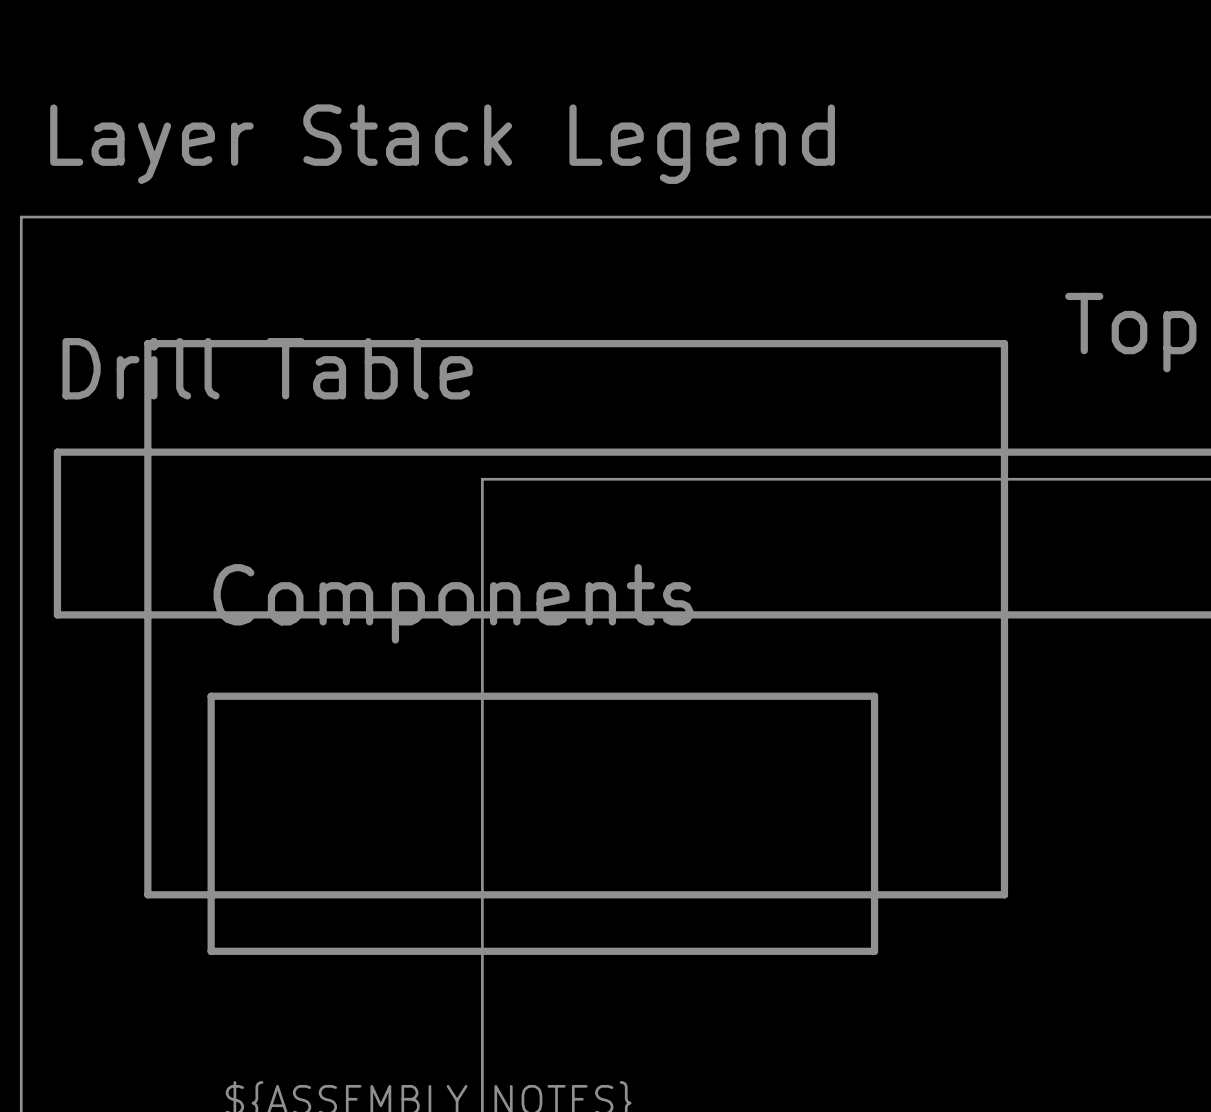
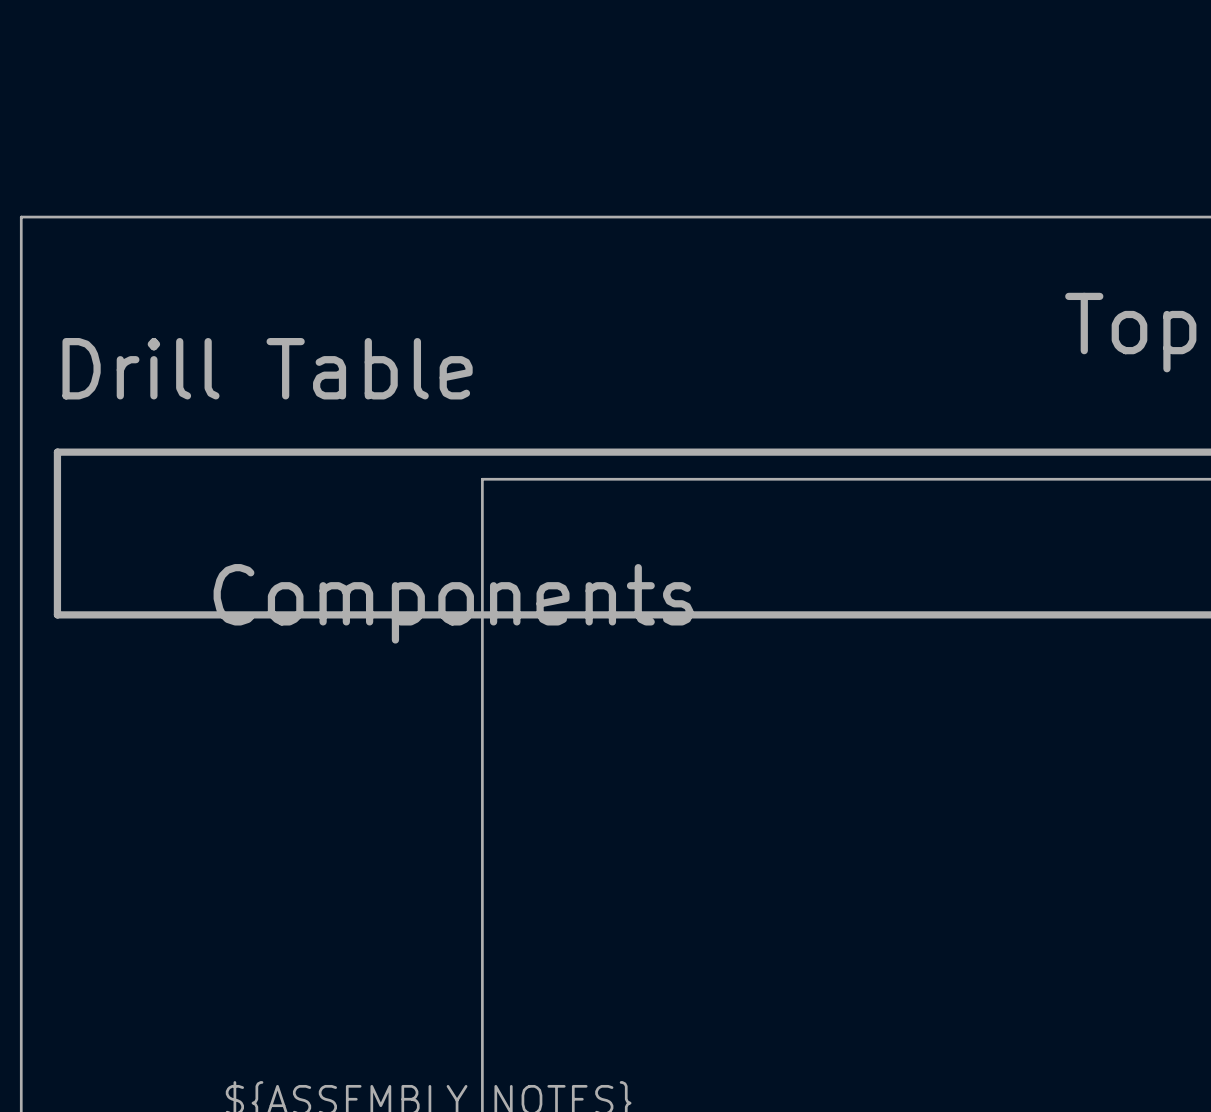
text: Layer Stack Legend (442, 144) -> none
line: (147, 343) (1004, 343) (1004, 894) (147, 894) (147, 343) -> none
line: (211, 696) (874, 696) (874, 951) (211, 951) (211, 696) -> none

